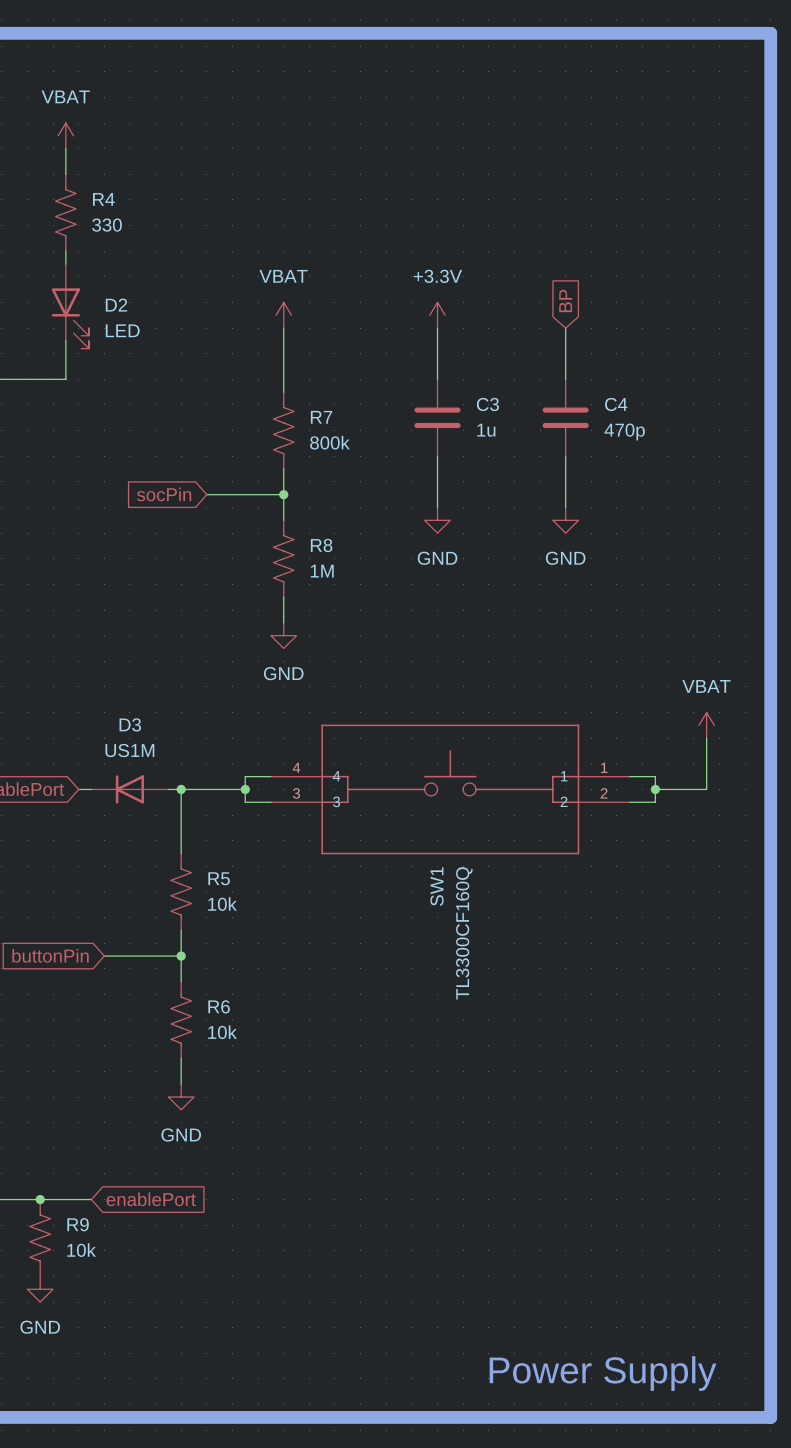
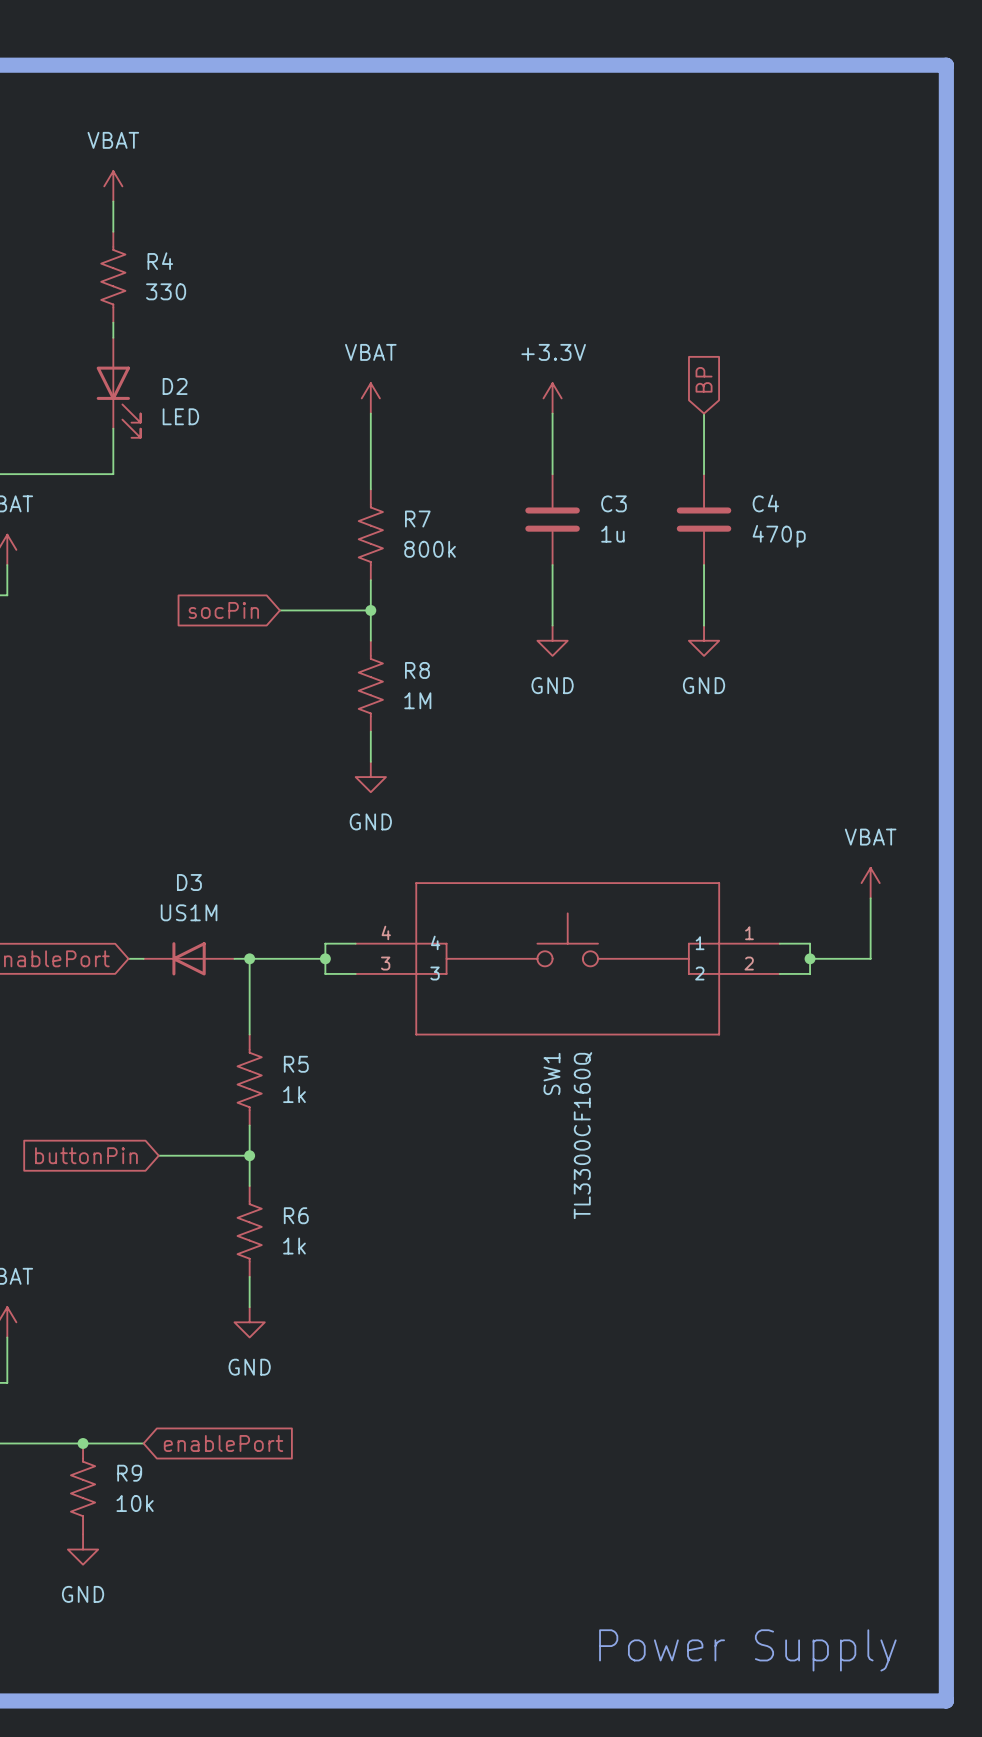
R5 value: 10k (222, 904) -> 1k (294, 1094)
R6 value: 10k (222, 1032) -> 1k (294, 1246)

